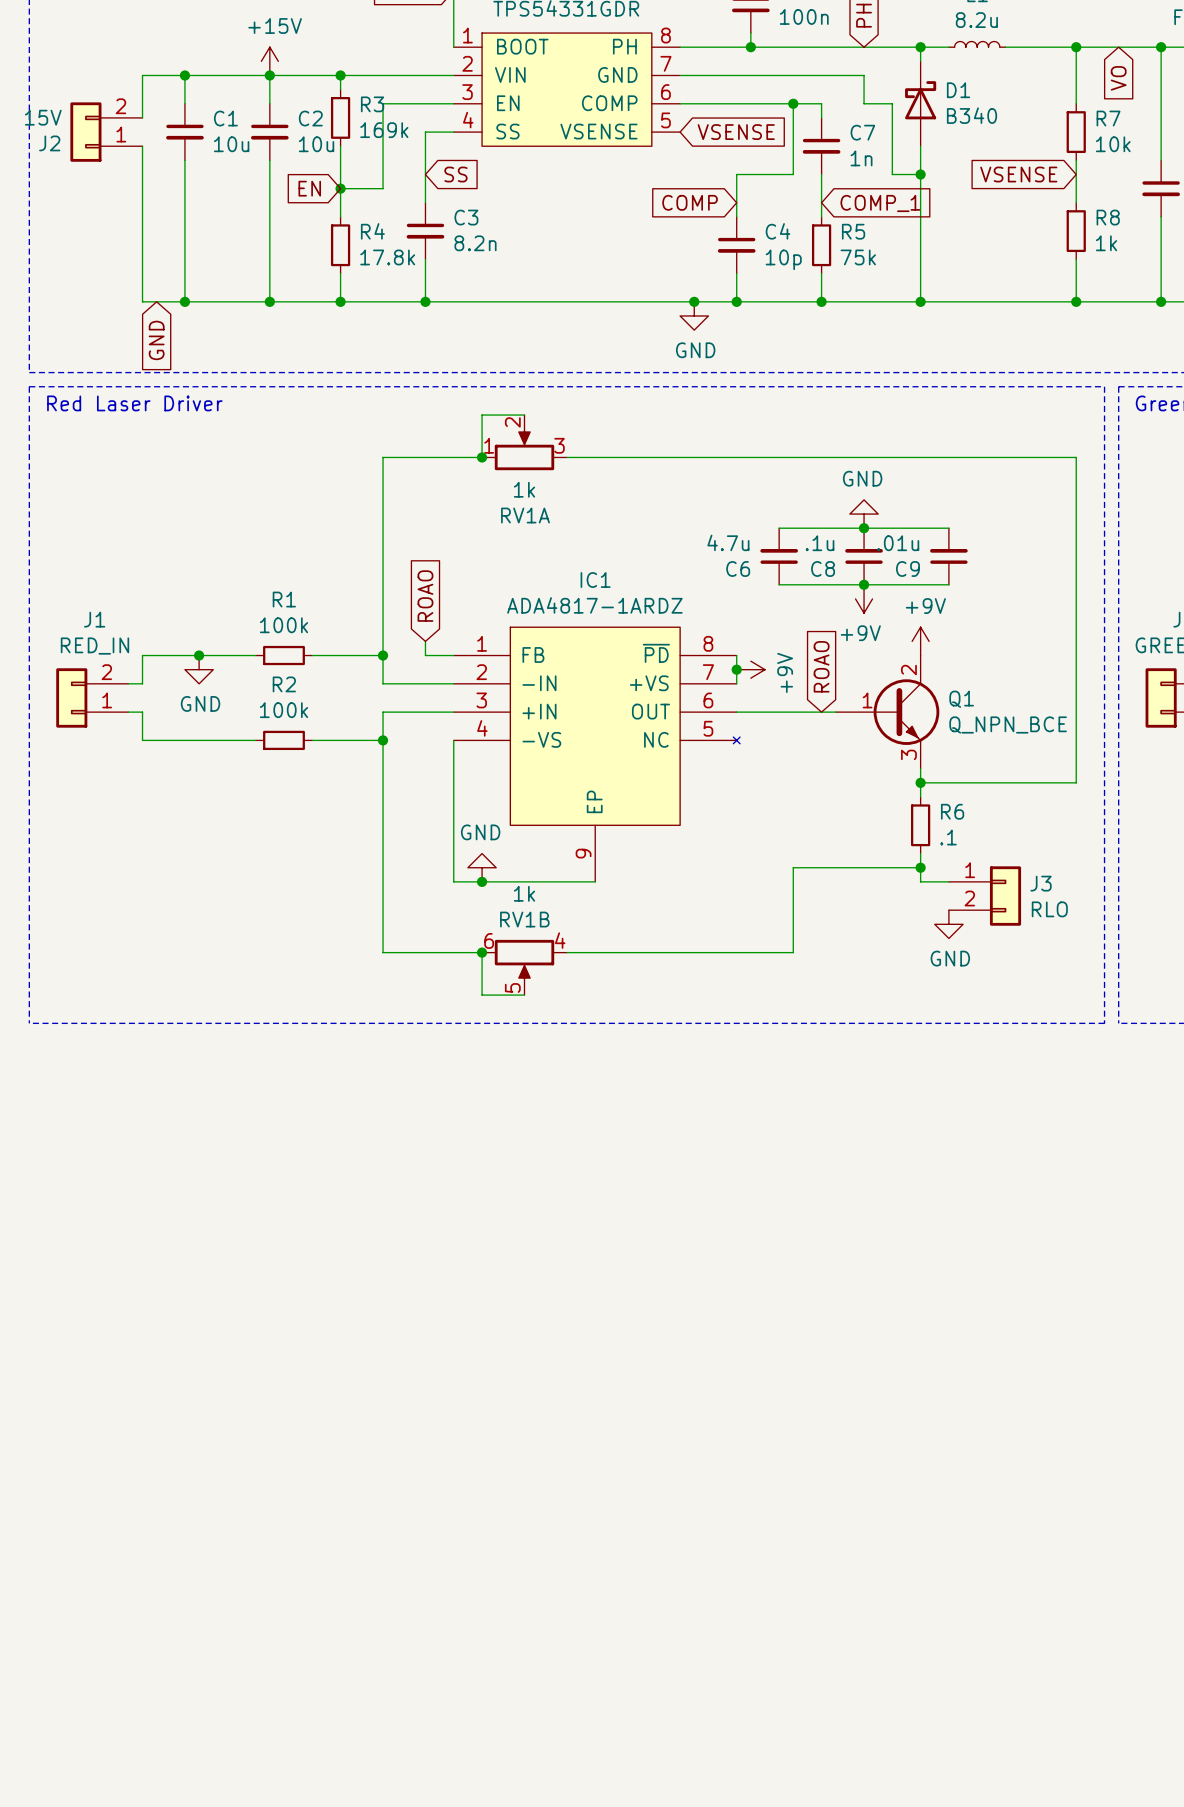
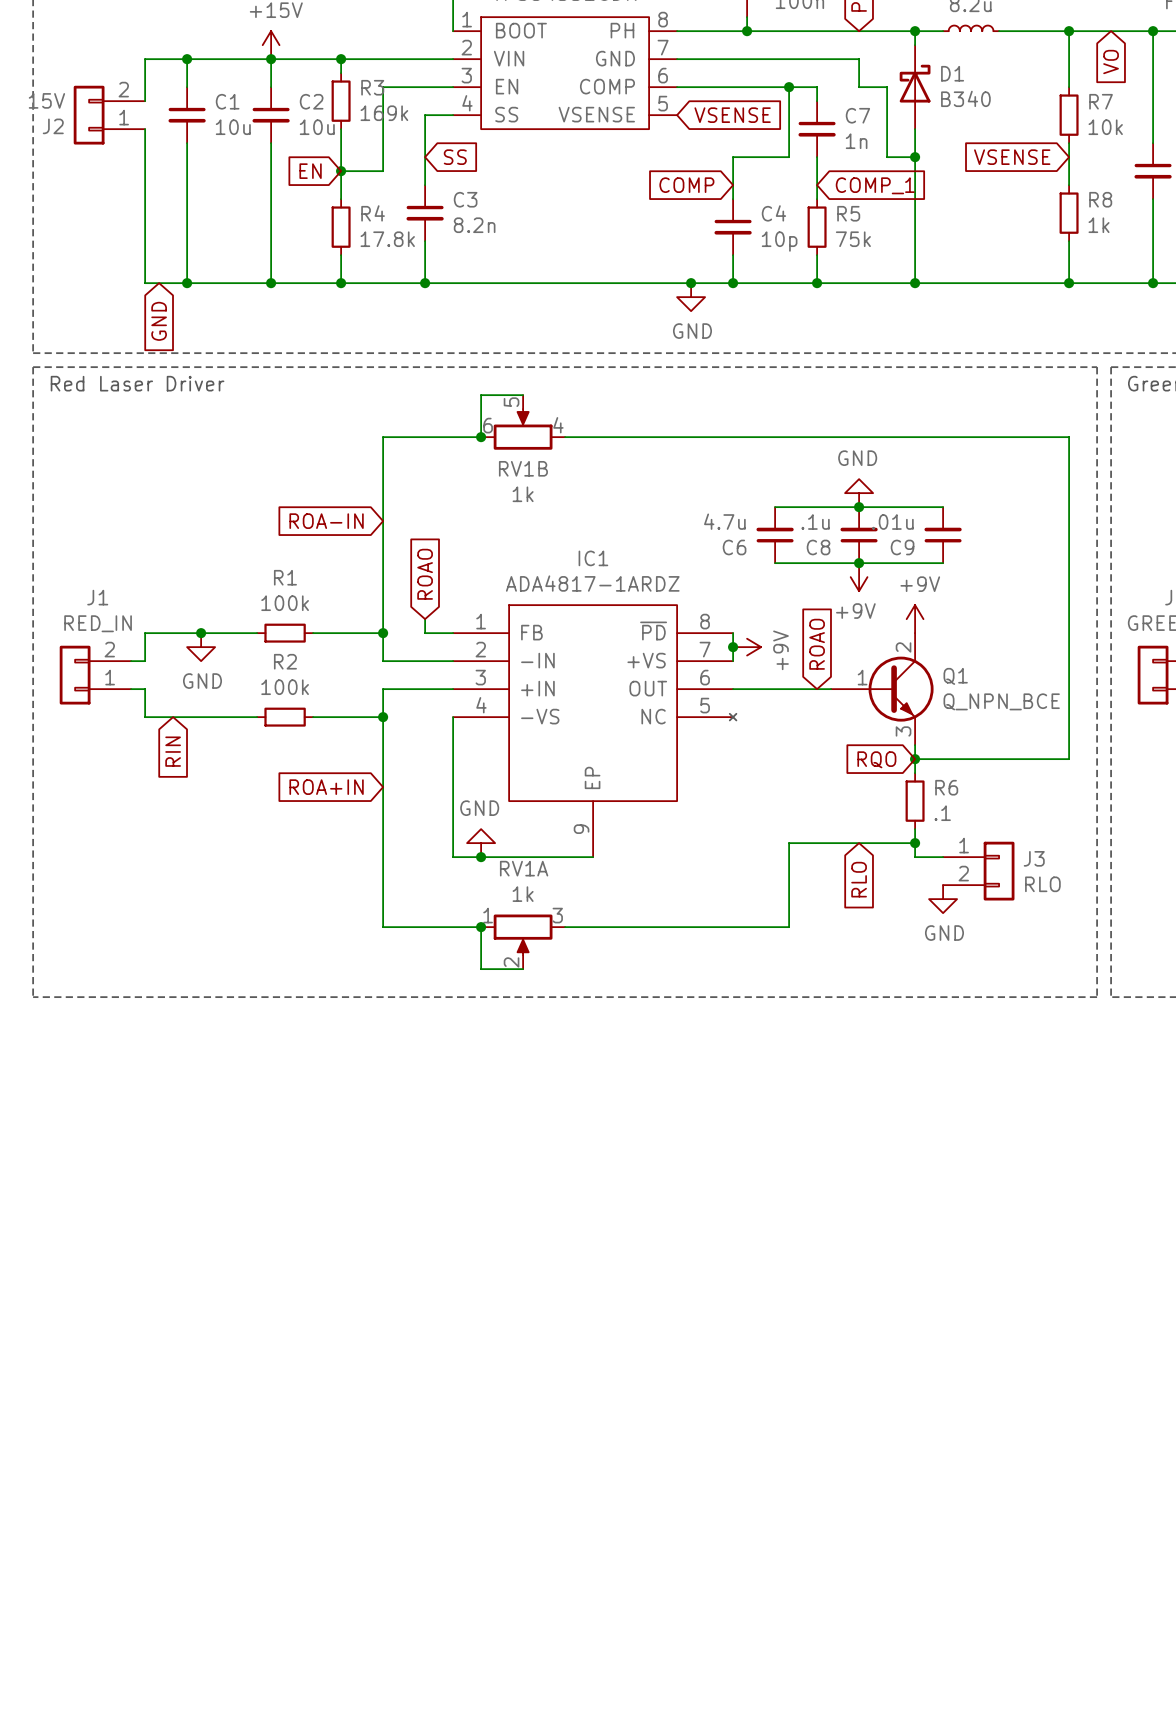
RV1A position: (524, 442) -> (523, 941)
RV1A flip: as is (524, 449) -> up-down (523, 934)
global label: none -> ROA-IN (326, 521)
global label: none -> RIN (173, 751)
global label: none -> RQO (876, 759)
global label: none -> ROA+IN (326, 787)
global label: none -> RLO (859, 879)
RV1B flip: as is (524, 960) -> up-down (523, 429)
RV1B position: (524, 967) -> (523, 422)

